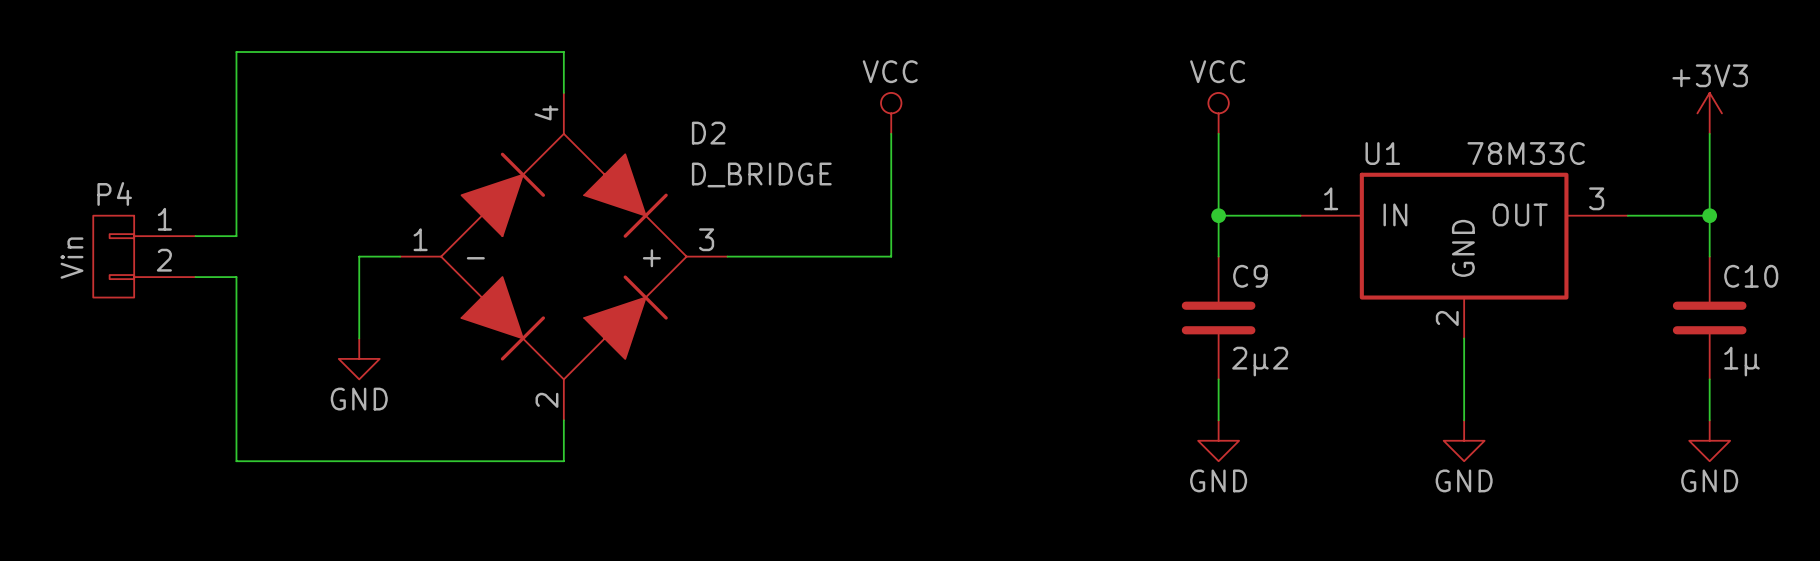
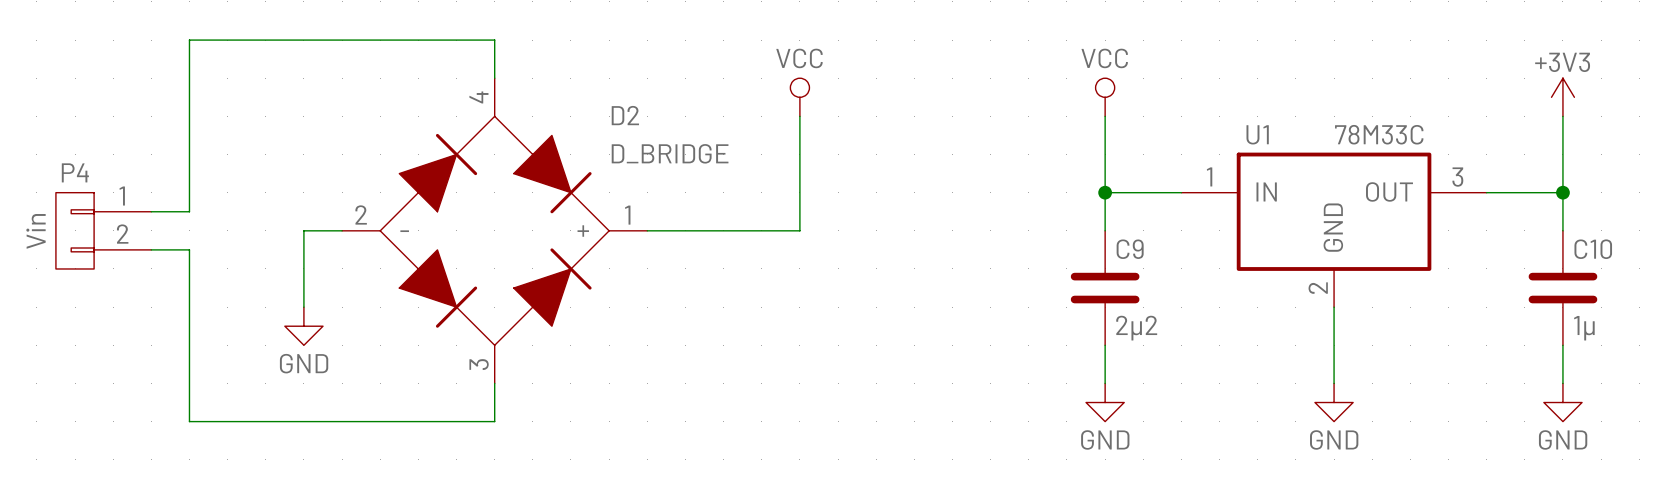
D2 pin number: 1 (420, 239) -> 2 (361, 214)
D2 pin number: 3 (706, 239) -> 1 (627, 215)
D2 pin number: 2 (546, 400) -> 3 (479, 364)

